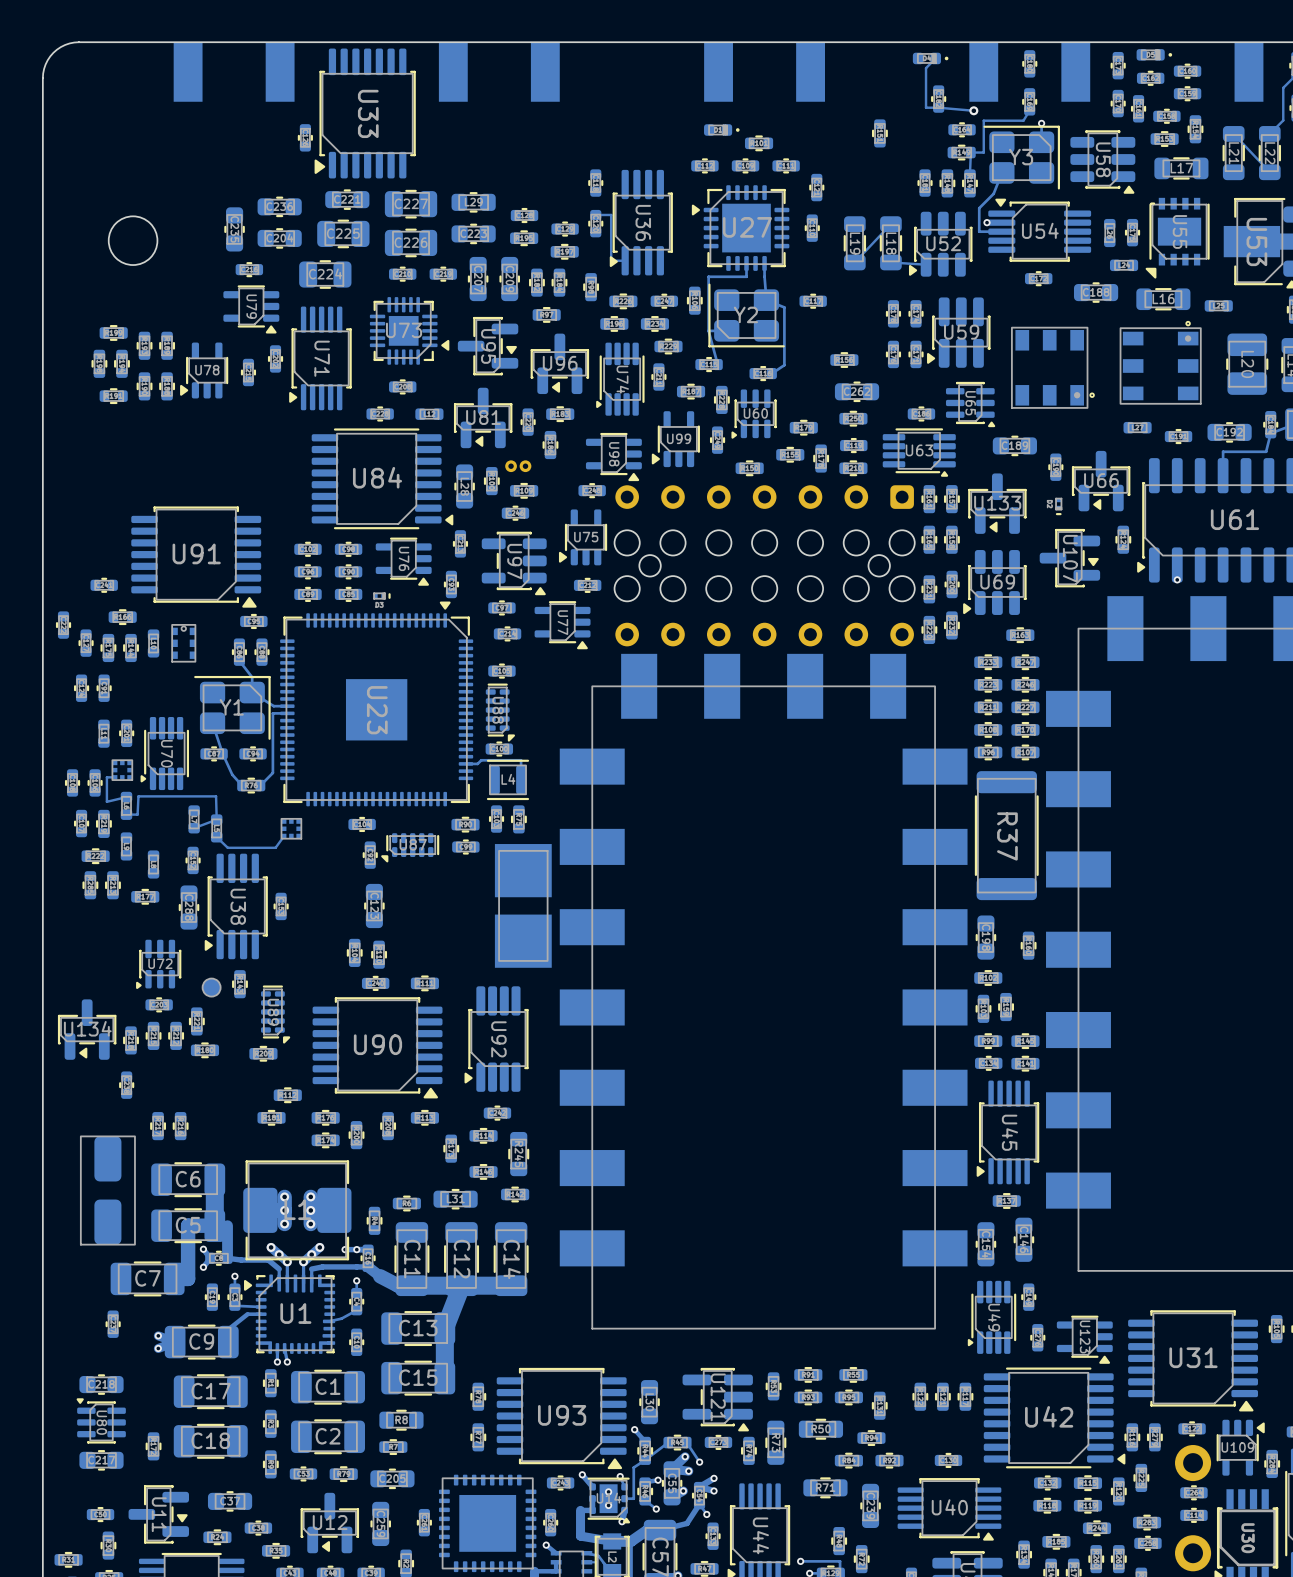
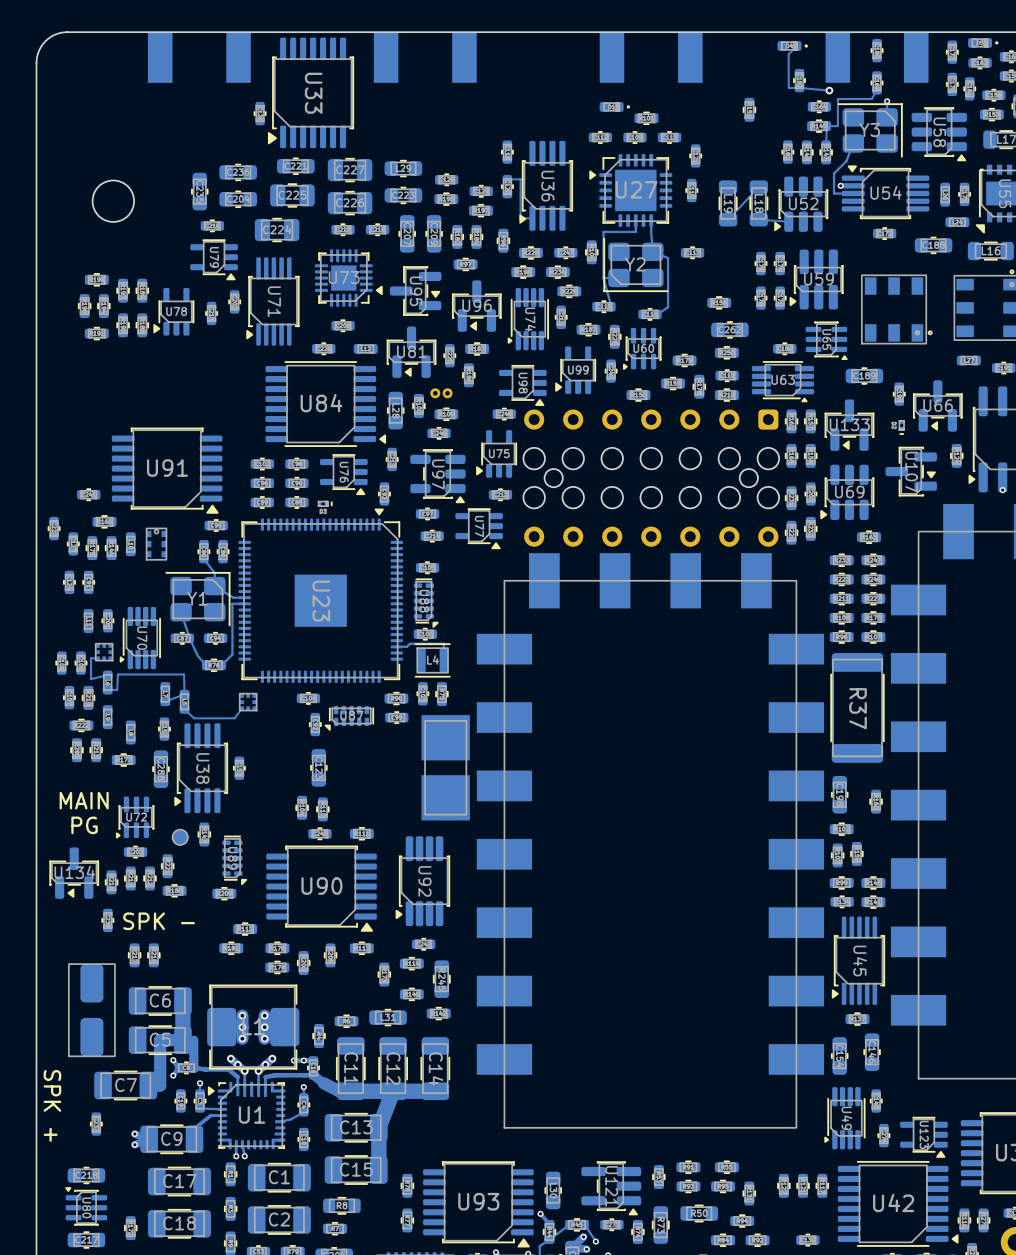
text: none -> MAIN (84, 800)
text: none -> PG (84, 825)
text: none -> SPK - (159, 921)
text: none -> SPK + (52, 1105)

